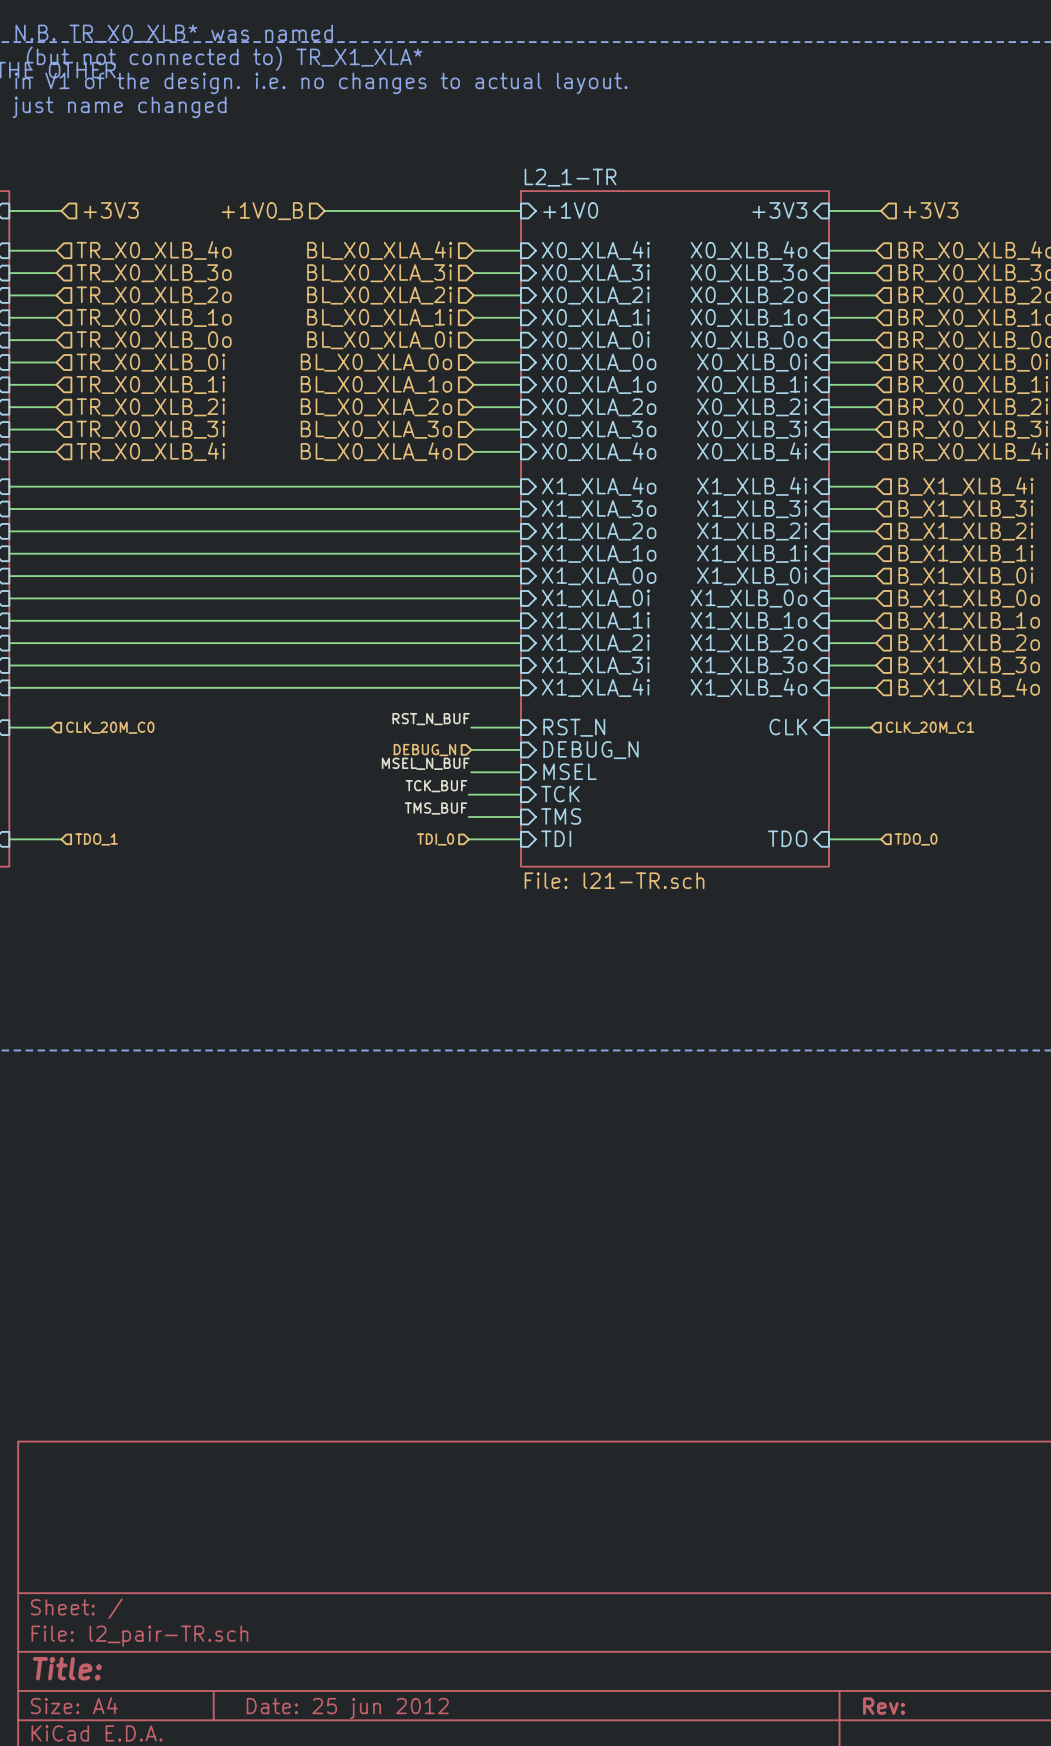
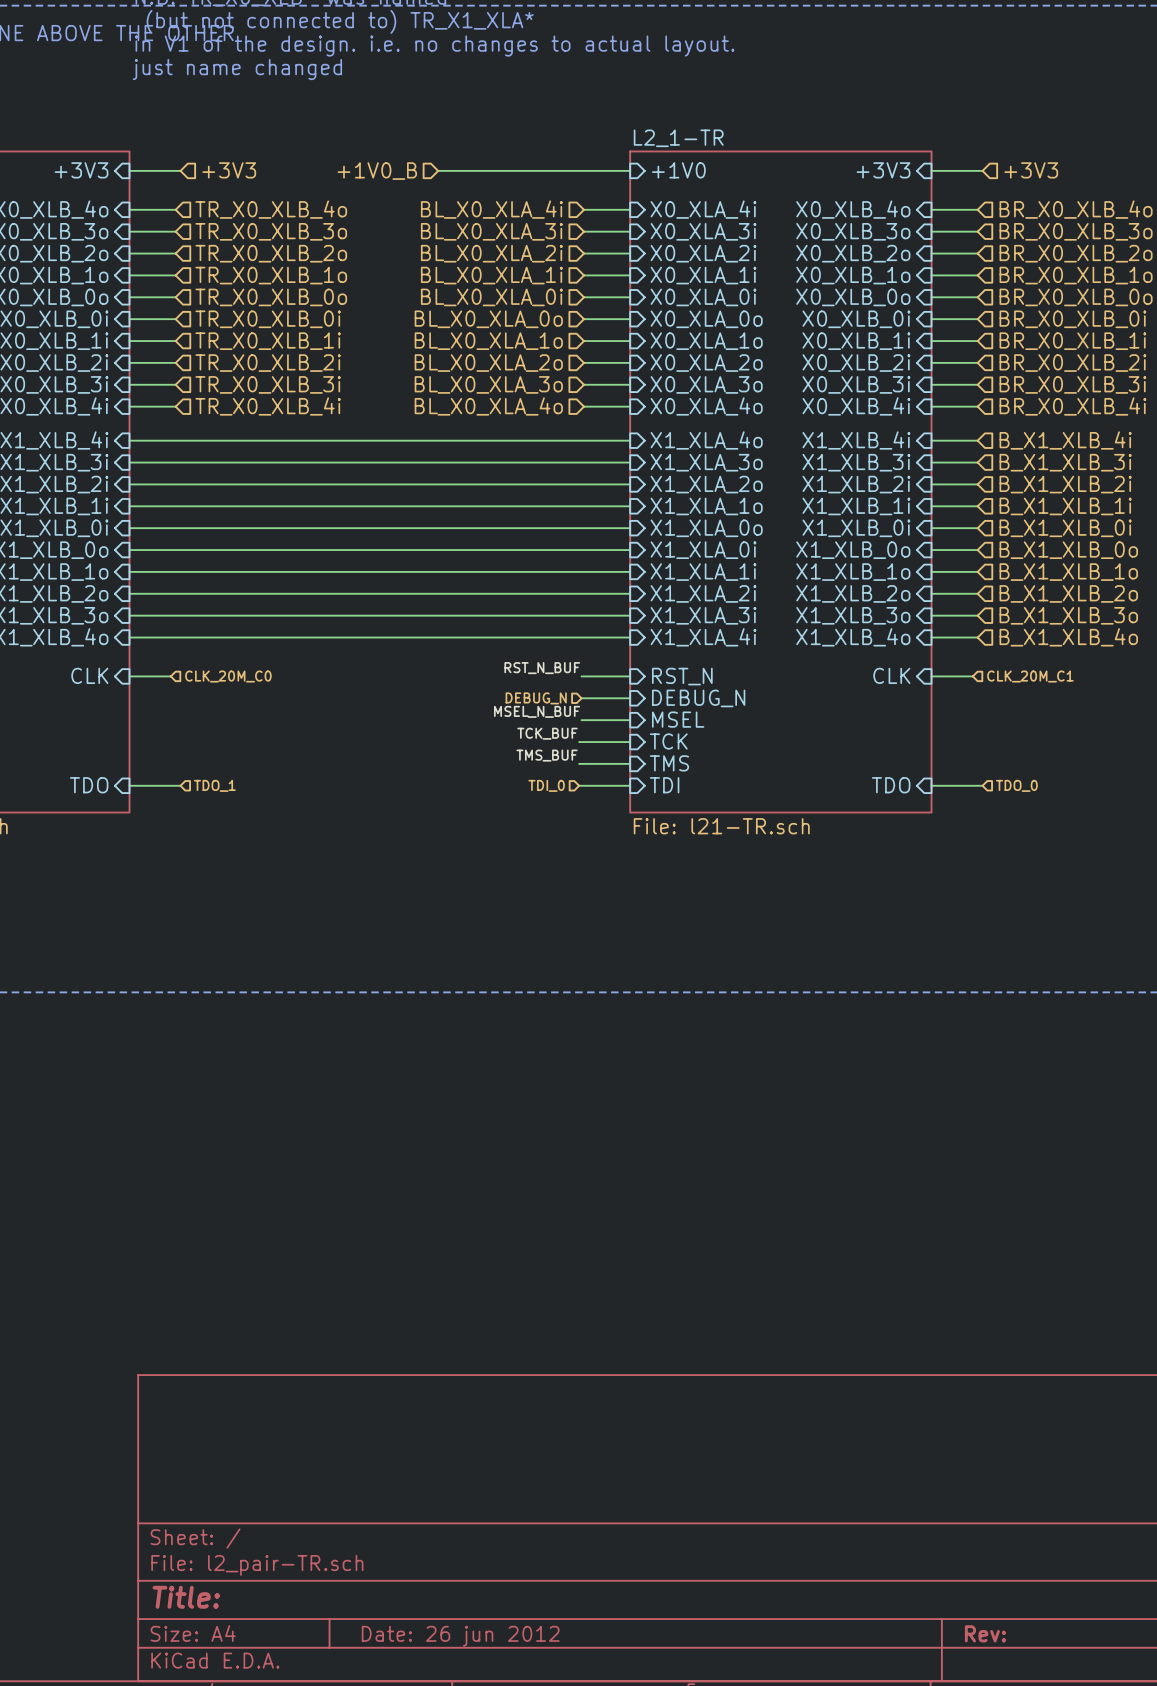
title block: Date: 25 jun 2012 (347, 1708) -> Date: 26 jun 2012 (460, 1636)

